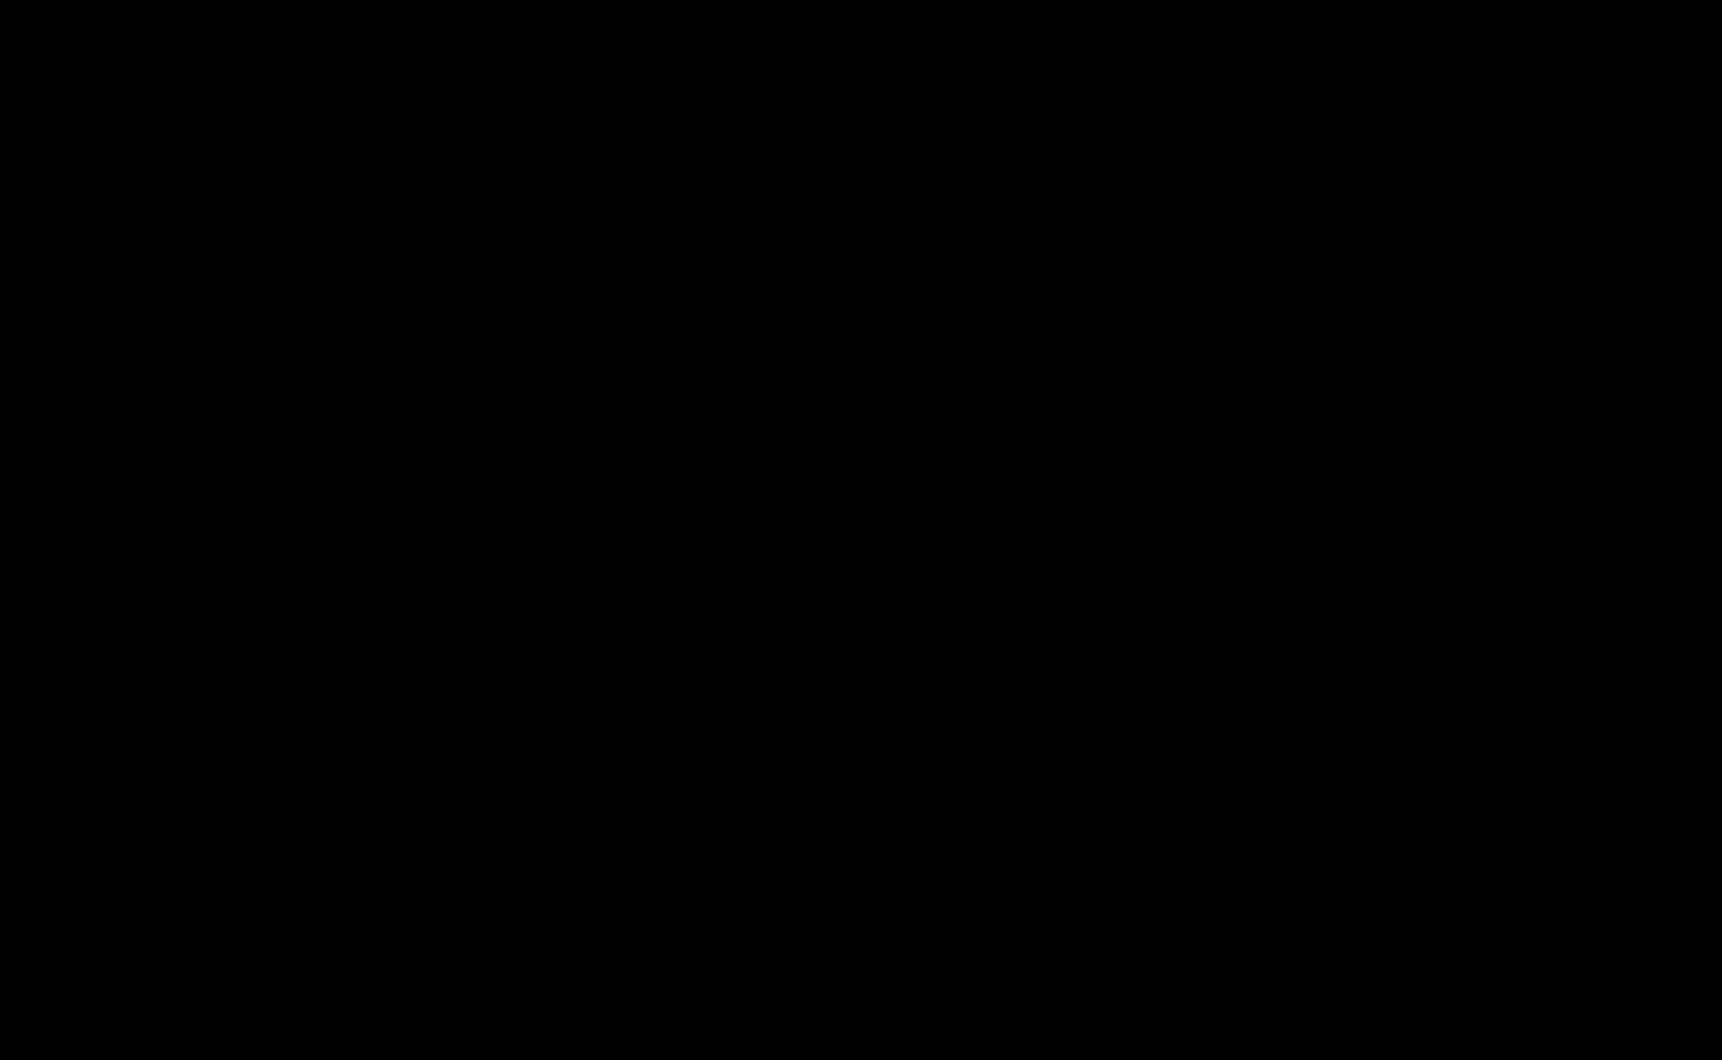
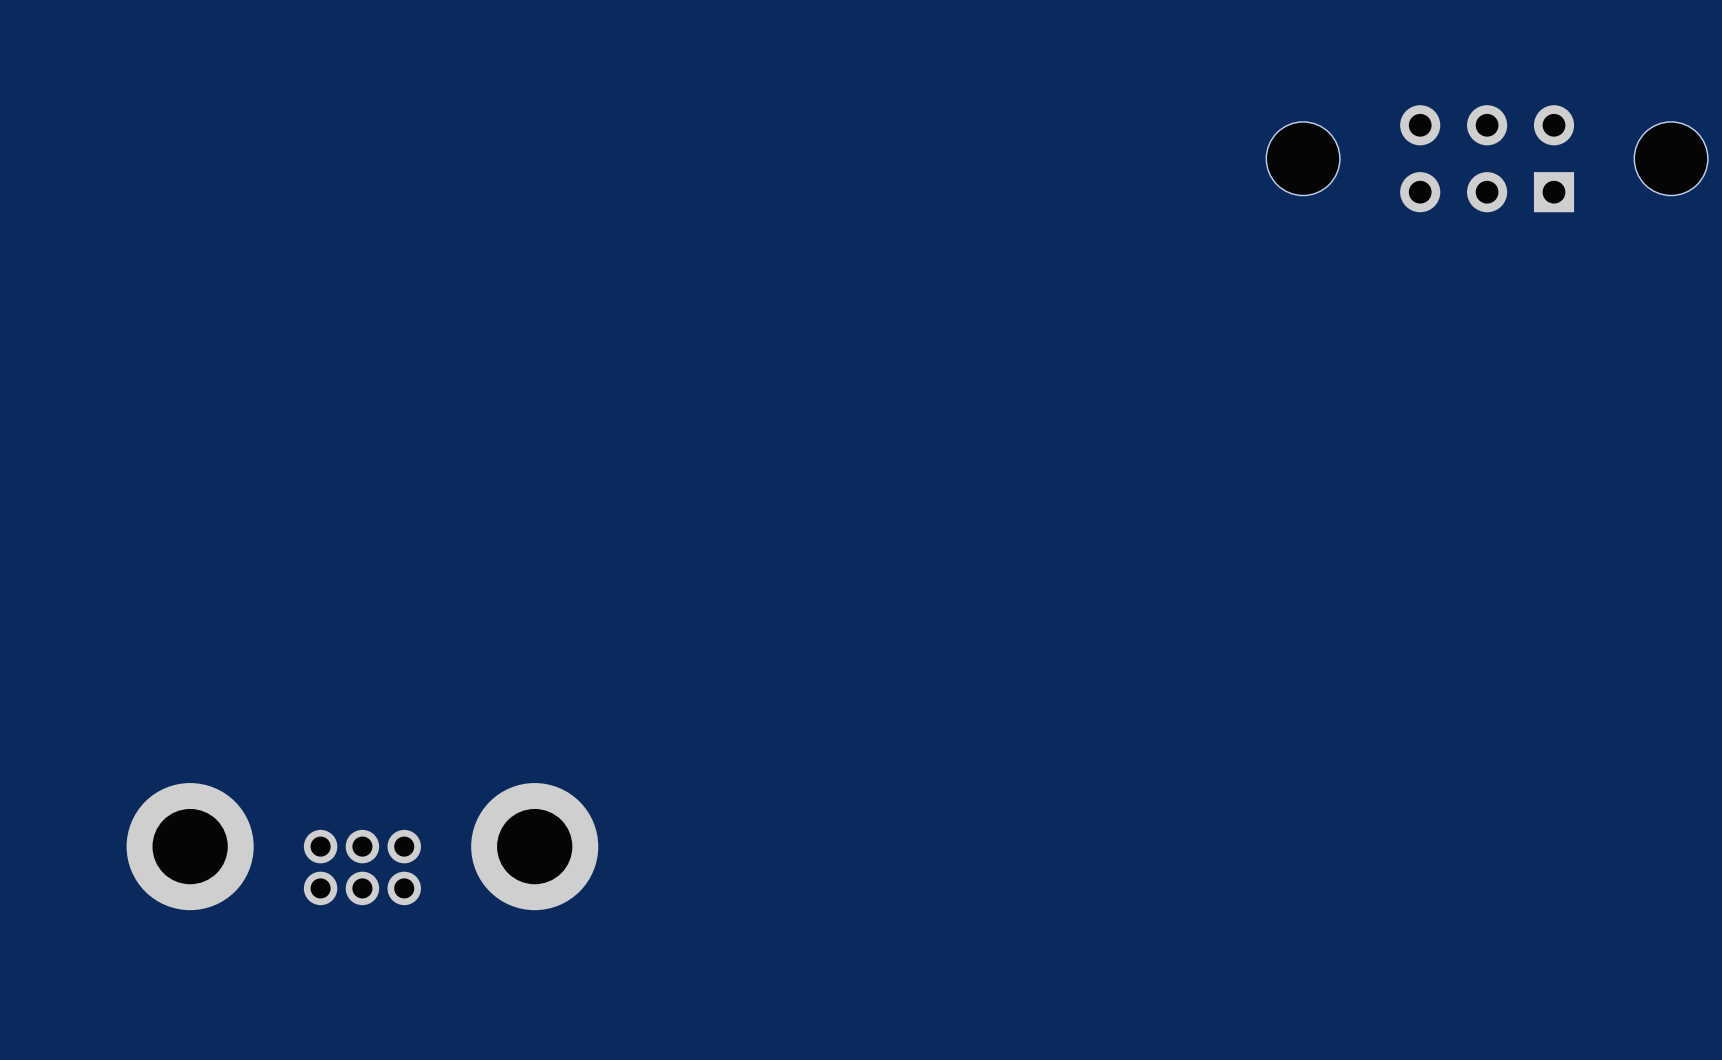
part: none -> (1487, 158)
part: none -> (362, 846)

